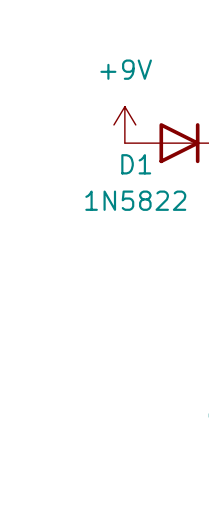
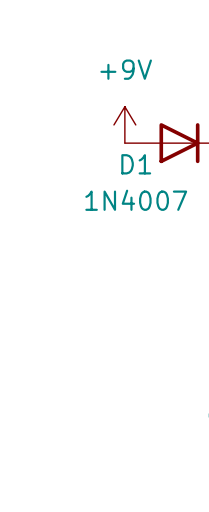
D1 value: 1N5822 (135, 200) -> 1N4007 (136, 200)

